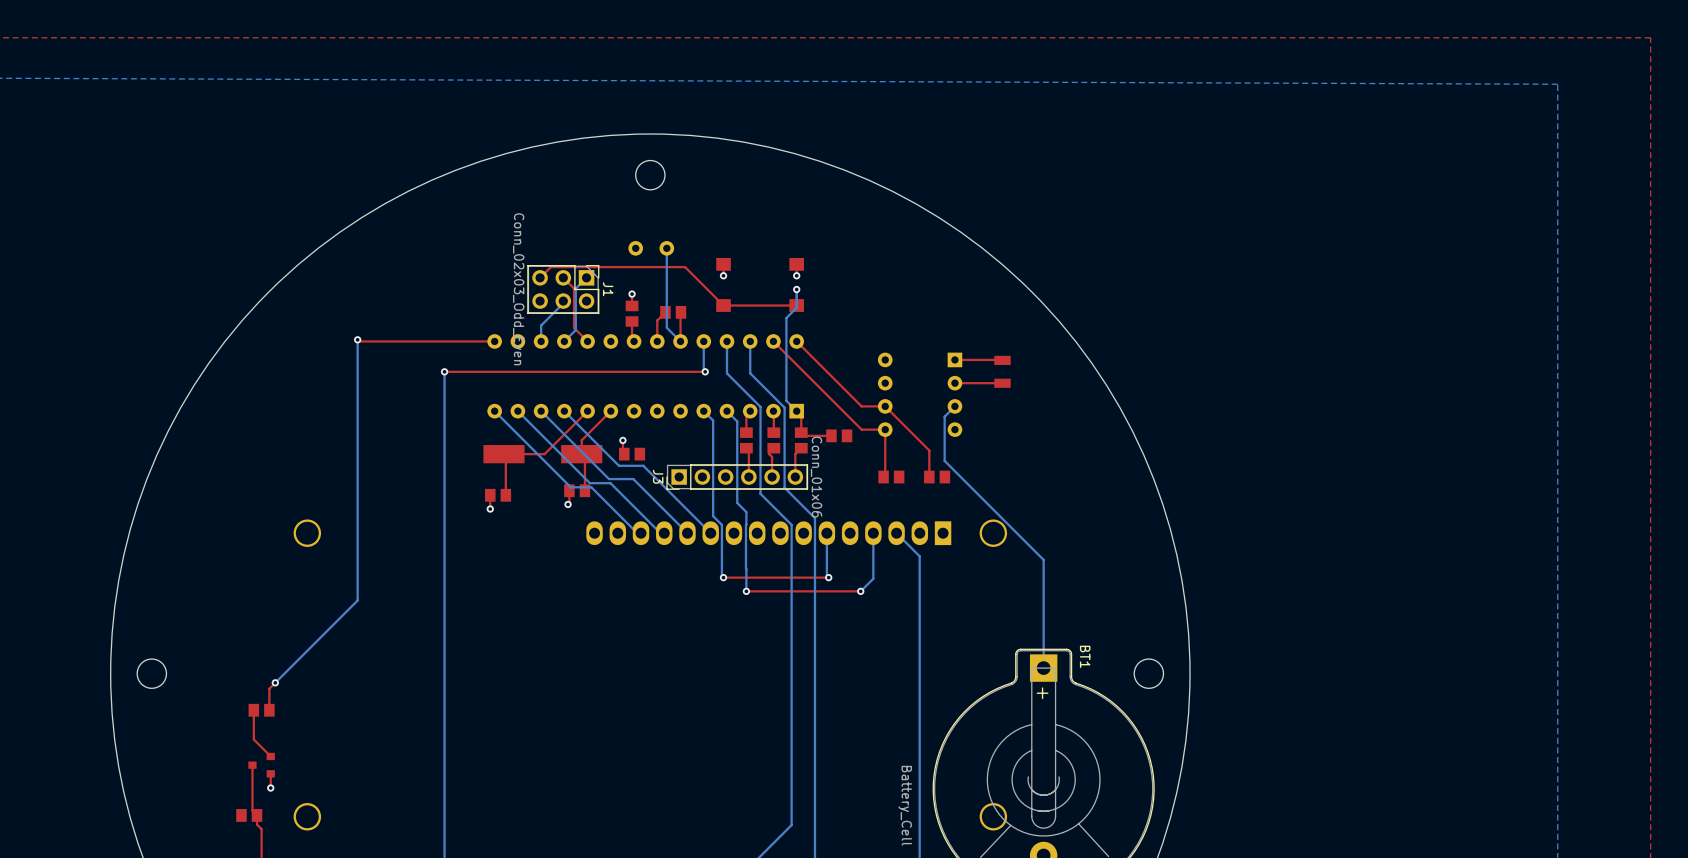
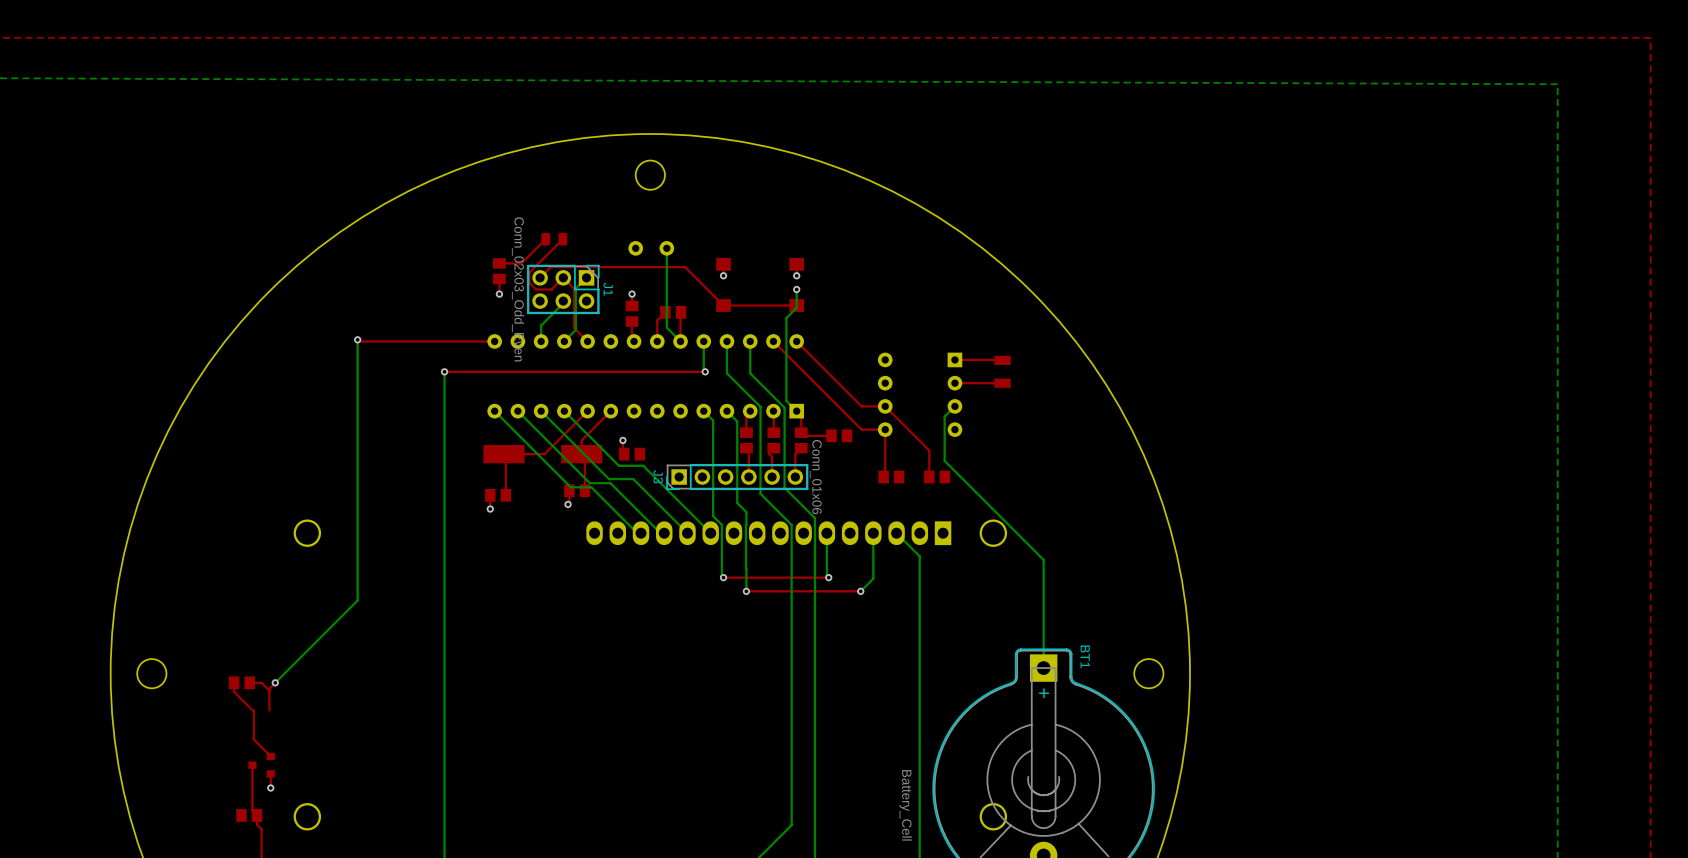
top track: none -> (545, 239) (521, 263) (499, 263)
part: none -> (554, 239)
top track: none -> (562, 239) (529, 272) (529, 282) (536, 289) (551, 289) (563, 277)
part: none -> (499, 271)
top track: none -> (499, 278) (499, 294)
via: none -> (499, 294)
top track: none -> (234, 682) (234, 691) (252, 710)
top track: none -> (249, 682) (261, 682) (269, 690)
part position: (261, 710) -> (241, 682)

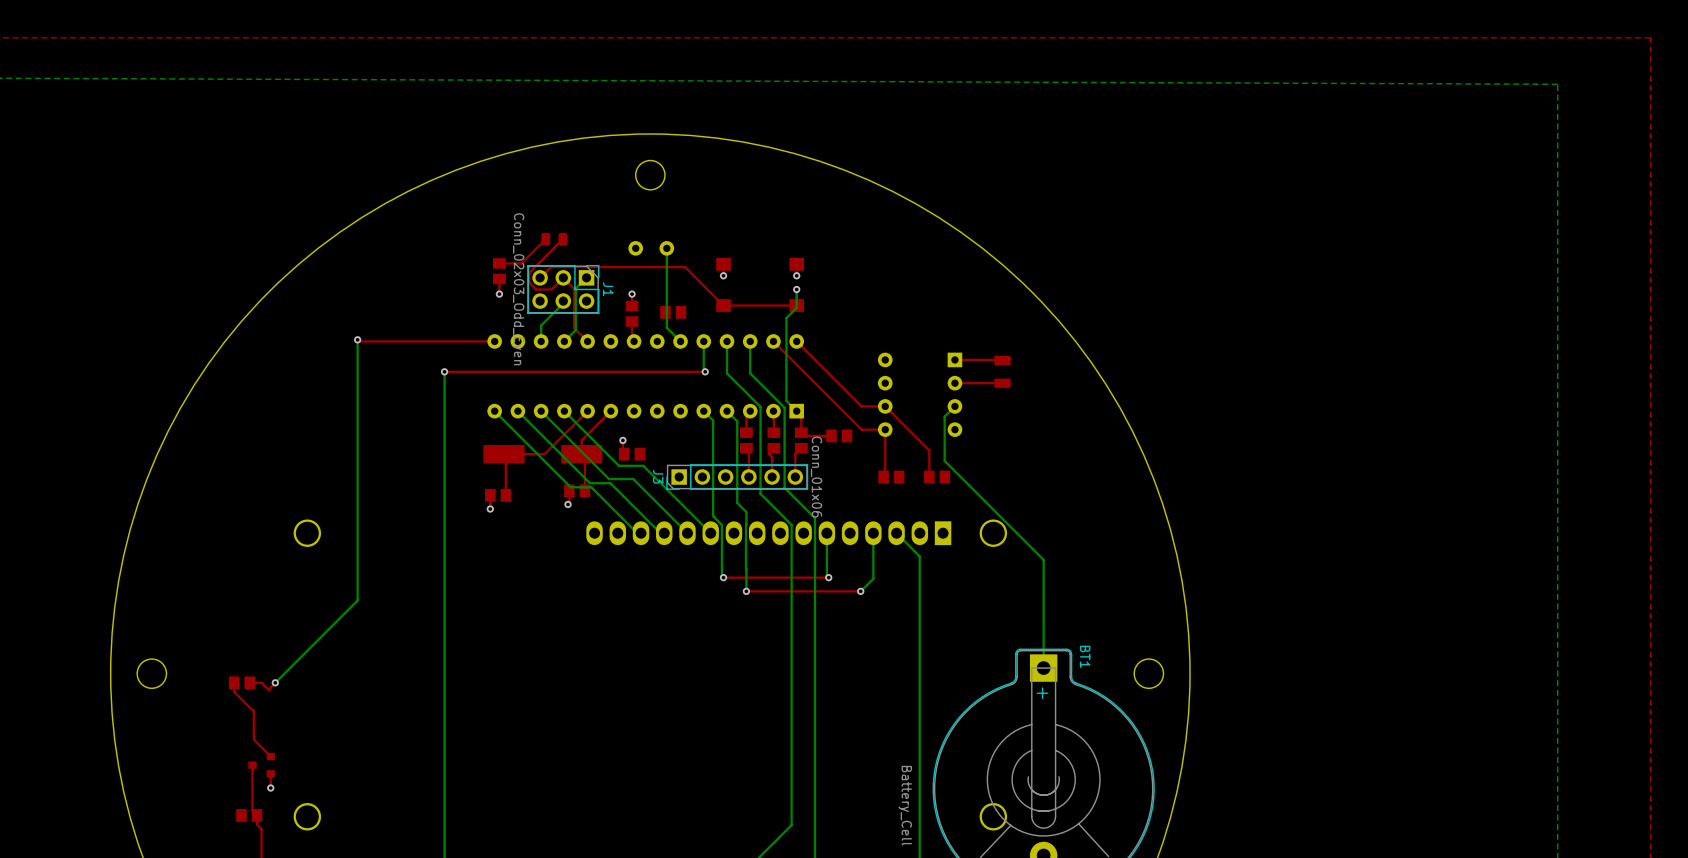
top track: (665, 312) (657, 320) (657, 341) -> none
top track: (680, 312) (680, 341) -> none
top track: (269, 688) (269, 710) -> none

